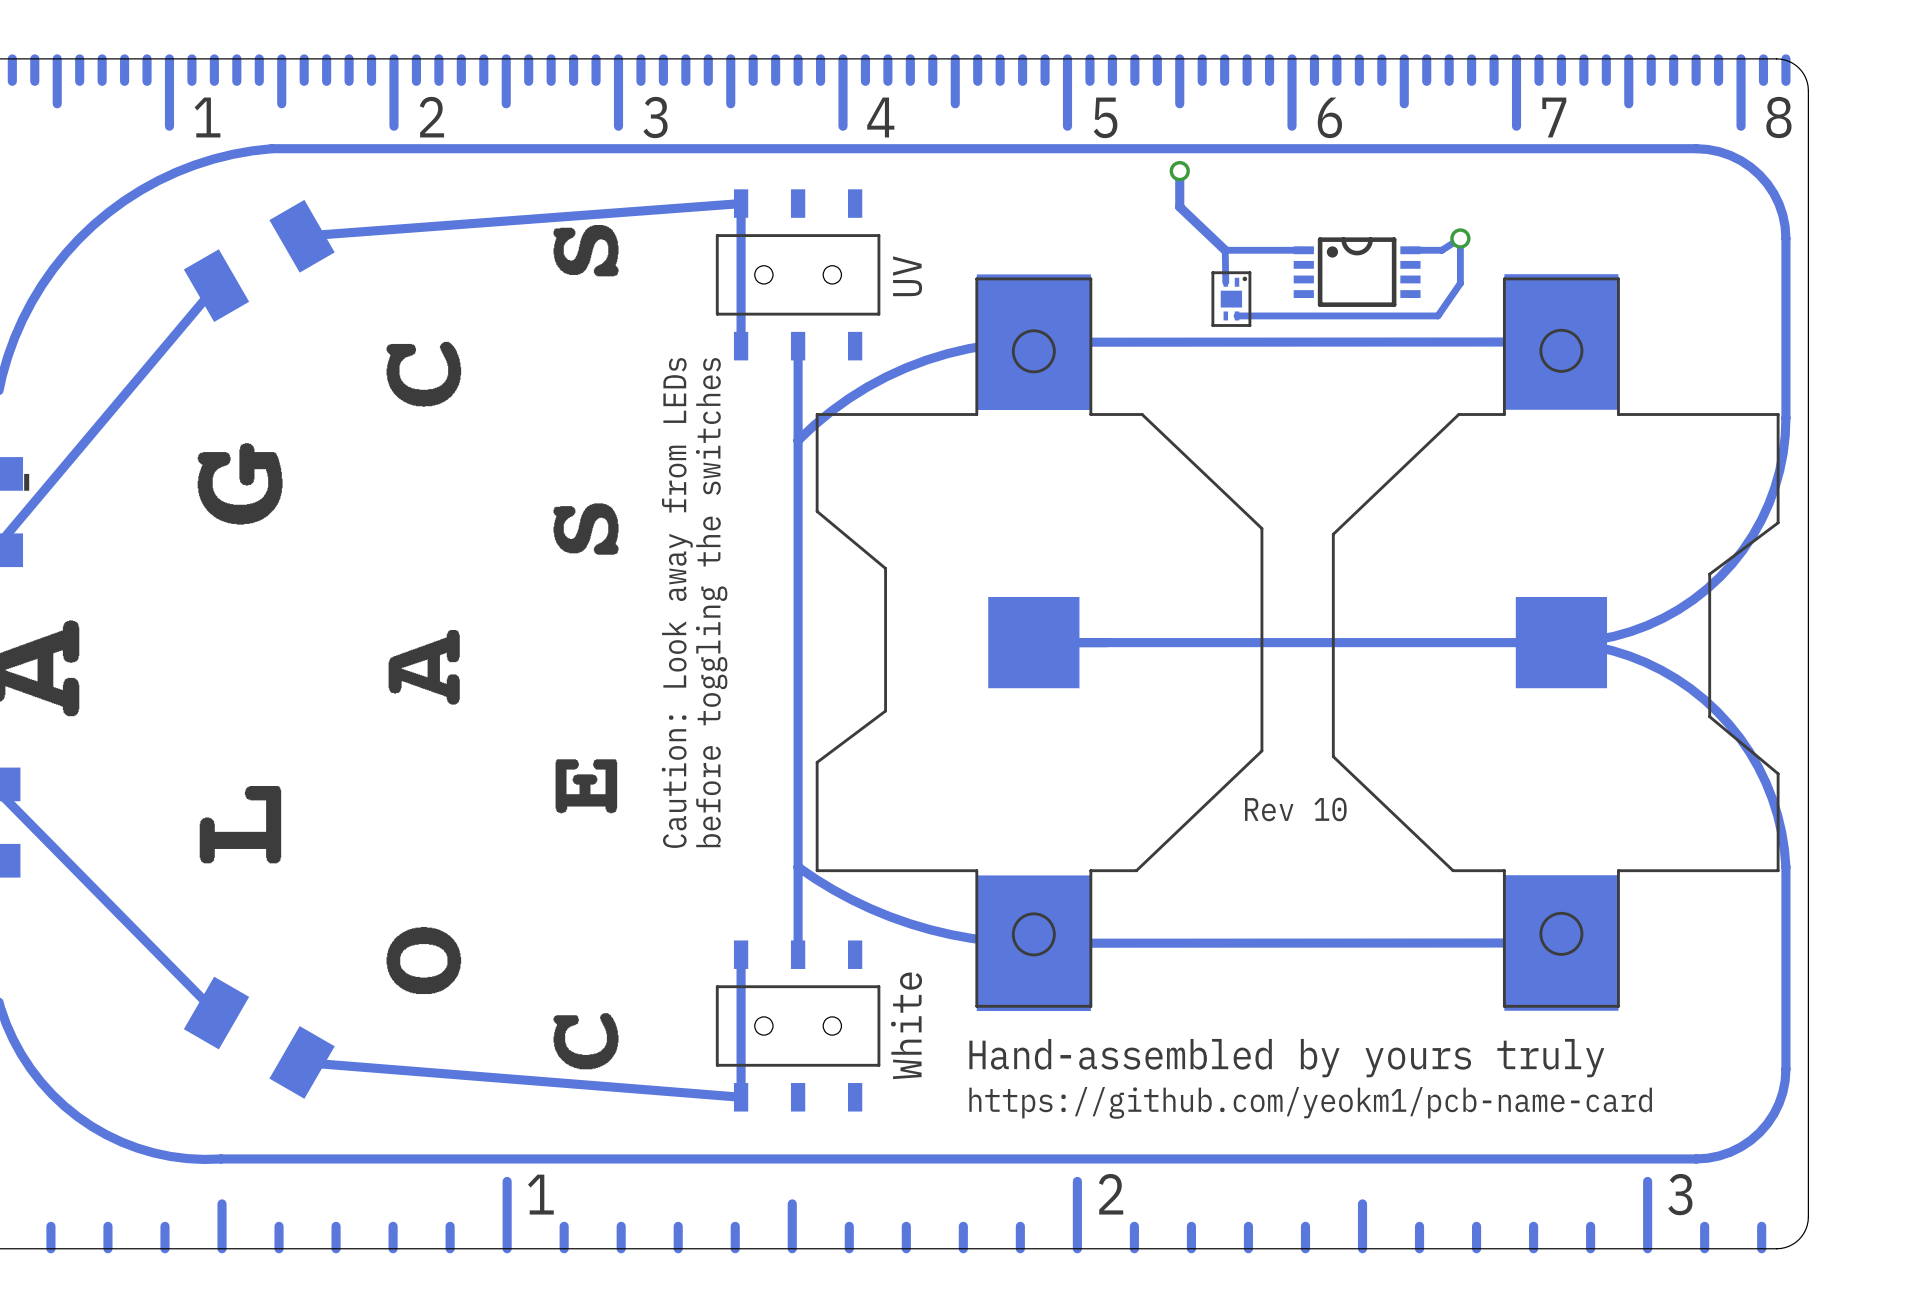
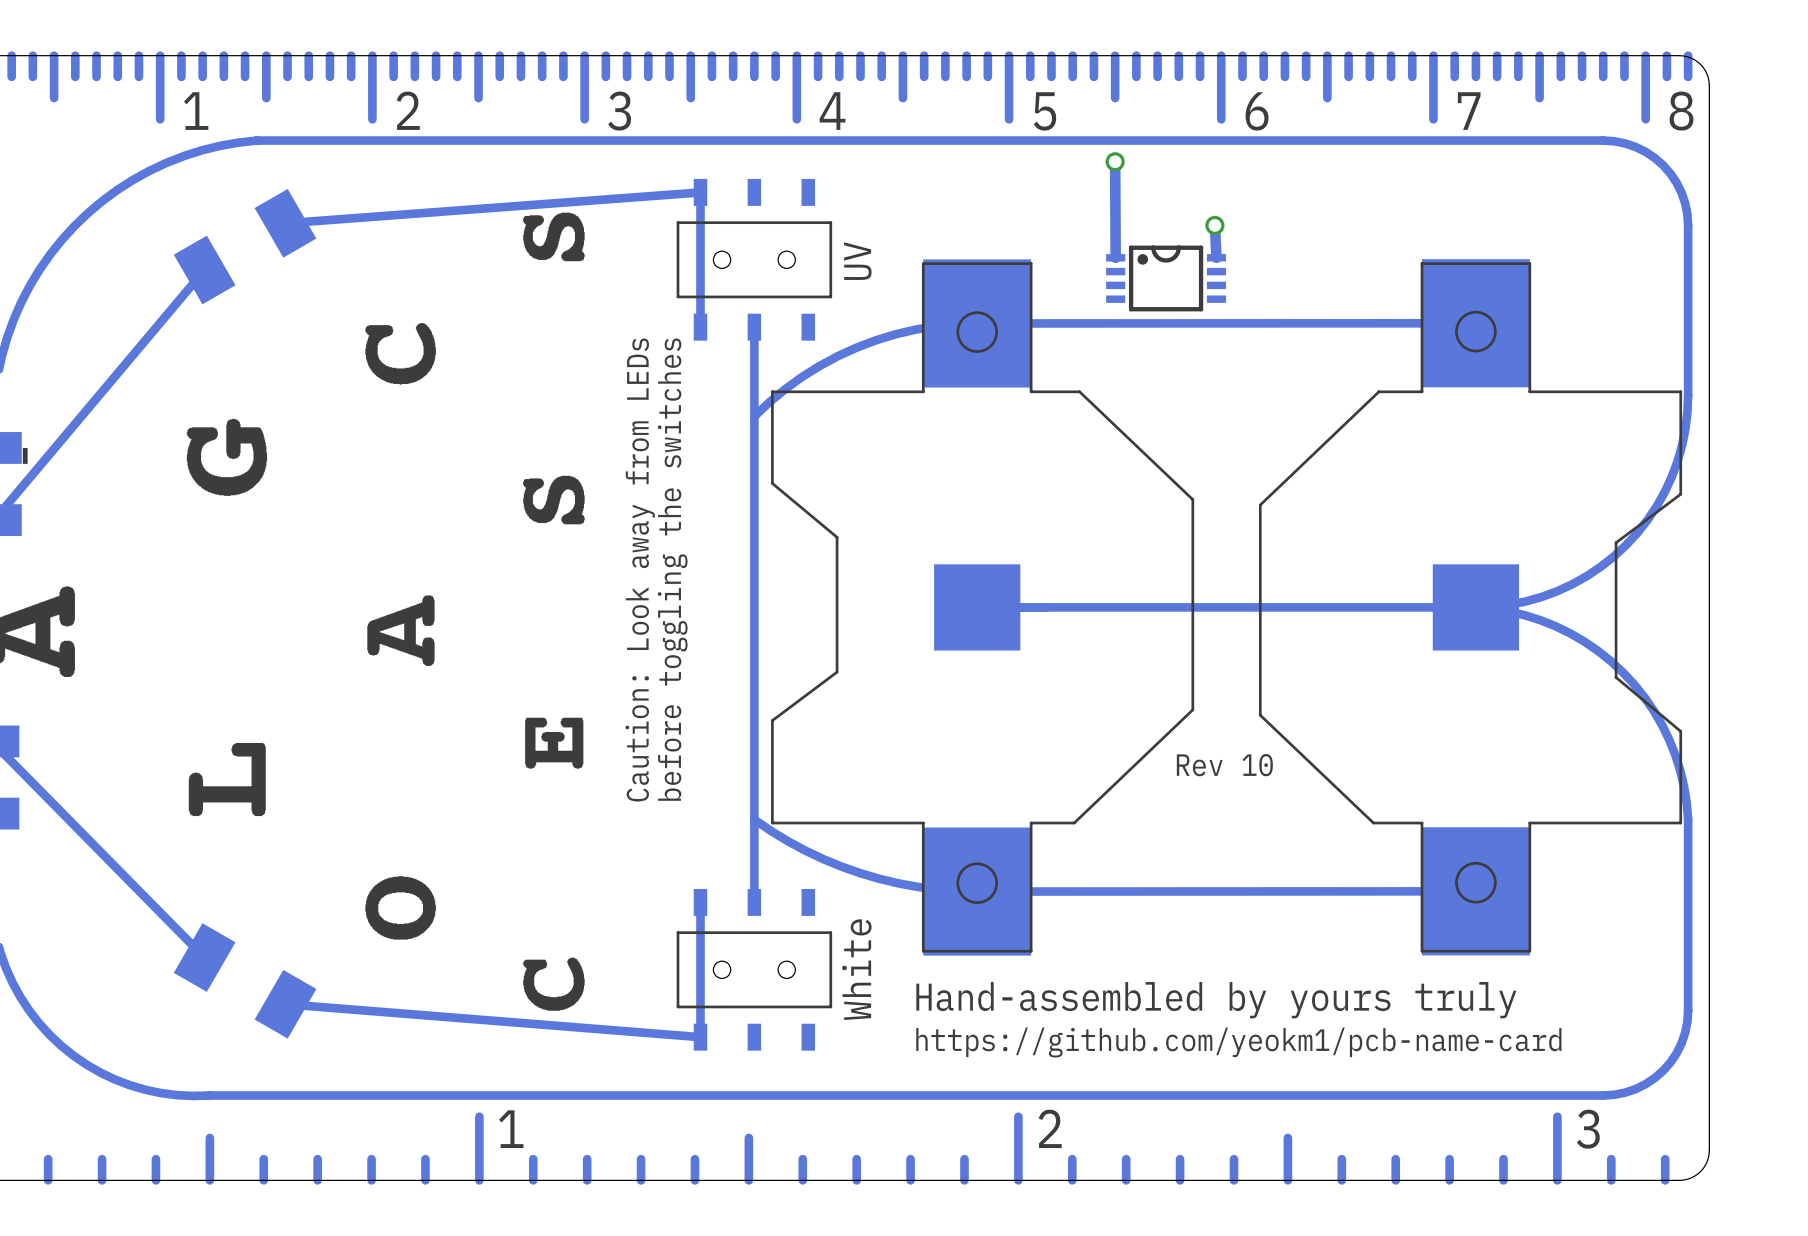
track: (1179, 171) (1179, 207) (1225, 250) -> (1115, 161) (1115, 257)
track: none -> (1214, 225) (1216, 257)
via: none -> (1214, 225)
via: (1460, 238) -> none
track: (1225, 250) (1225, 282) -> none
track: (1303, 250) (1225, 250) -> none
track: (1410, 250) (1441, 250) (1460, 238) (1460, 283) (1437, 315) (1237, 315) -> none
part footprint: [1211, 271, 1252, 327] -> [1106, 245, 1227, 312]
part: (1357, 272) -> none

